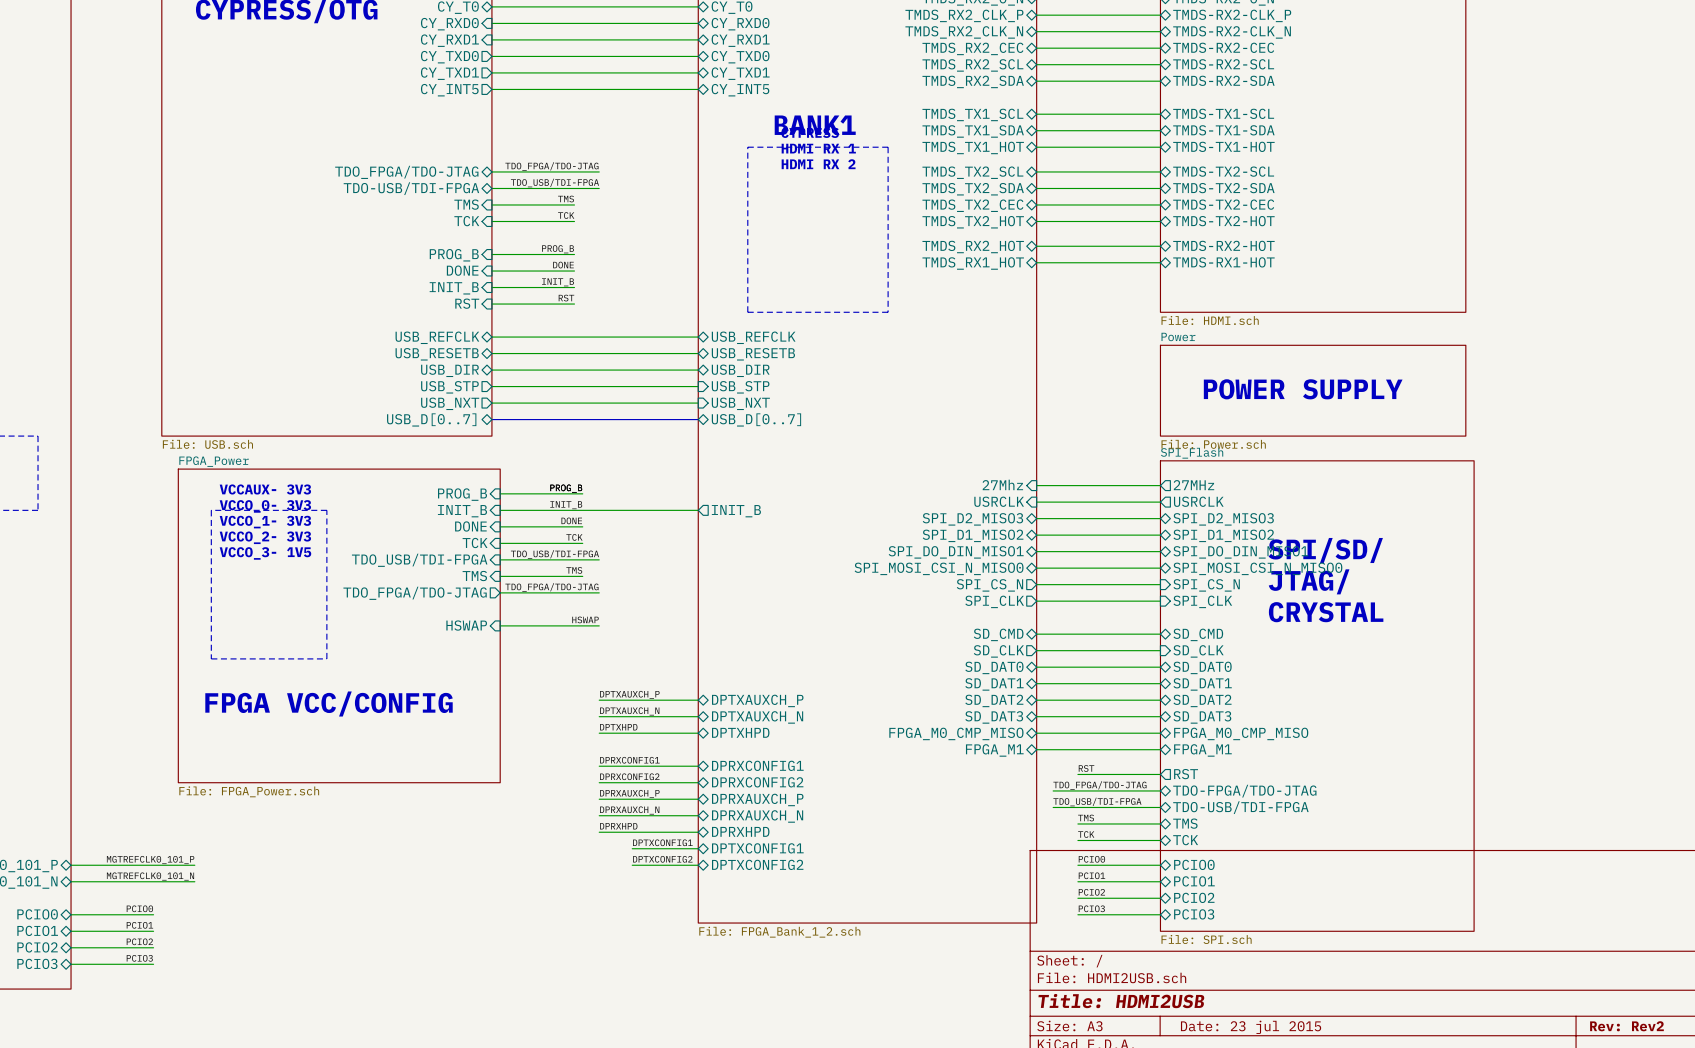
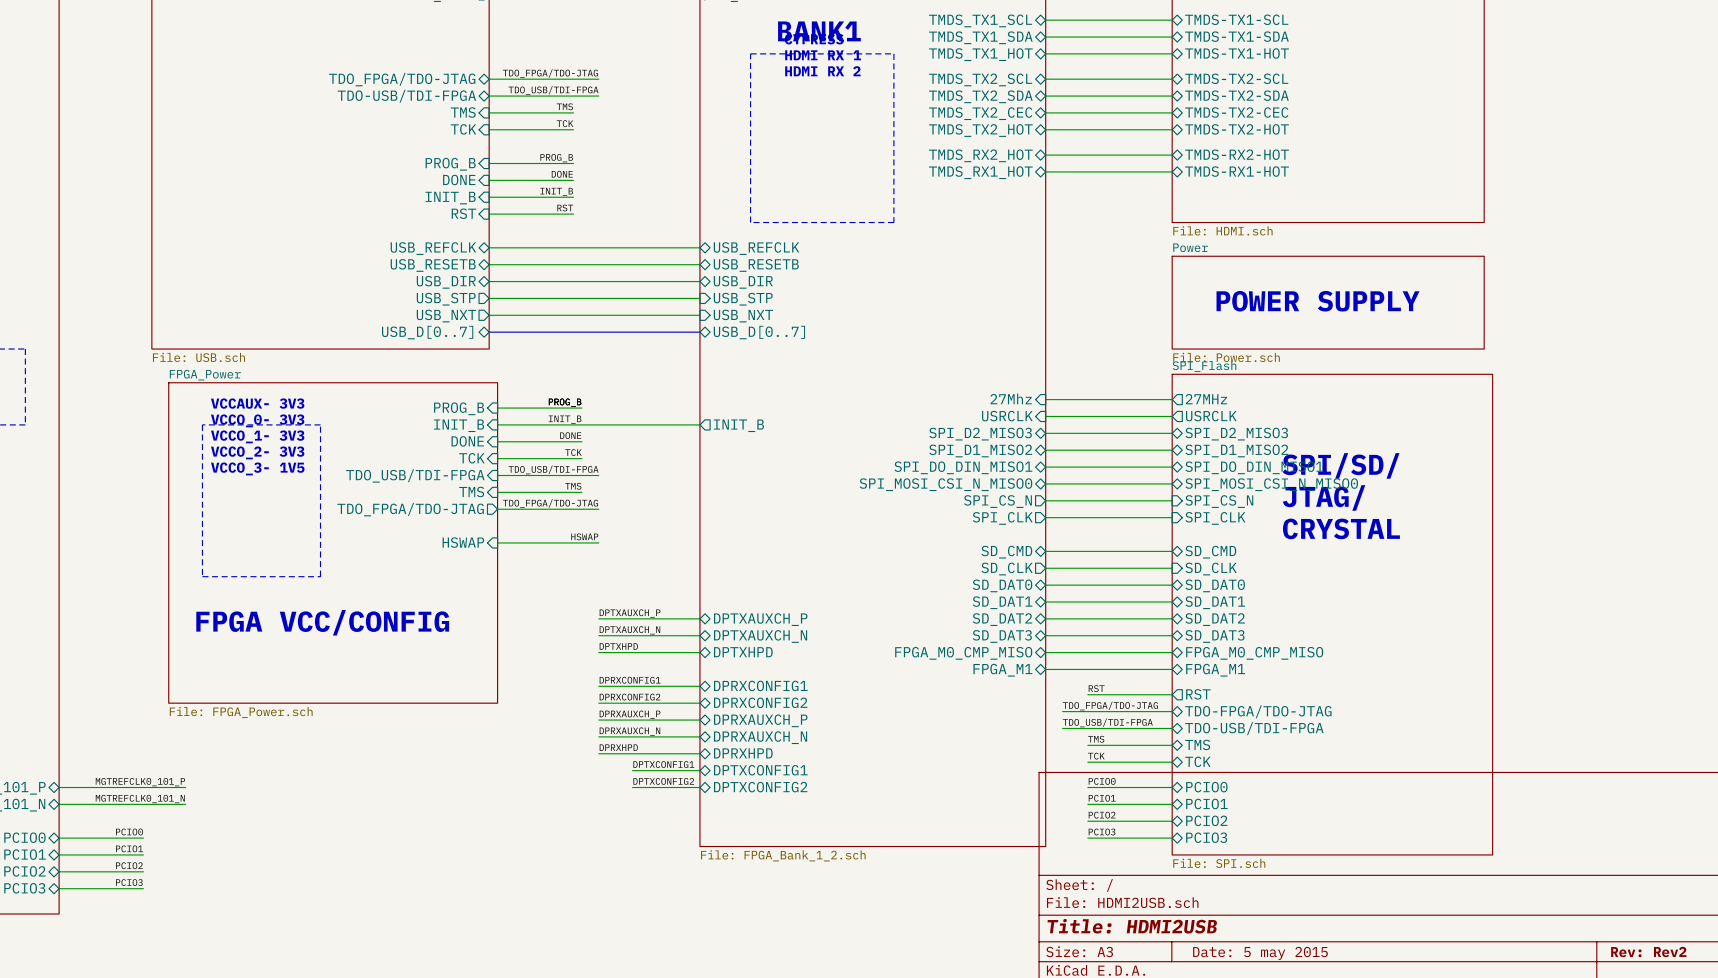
title block: Date: 23 jul 2015 (1251, 1027) -> Date: 5 may 2015 (1260, 953)

